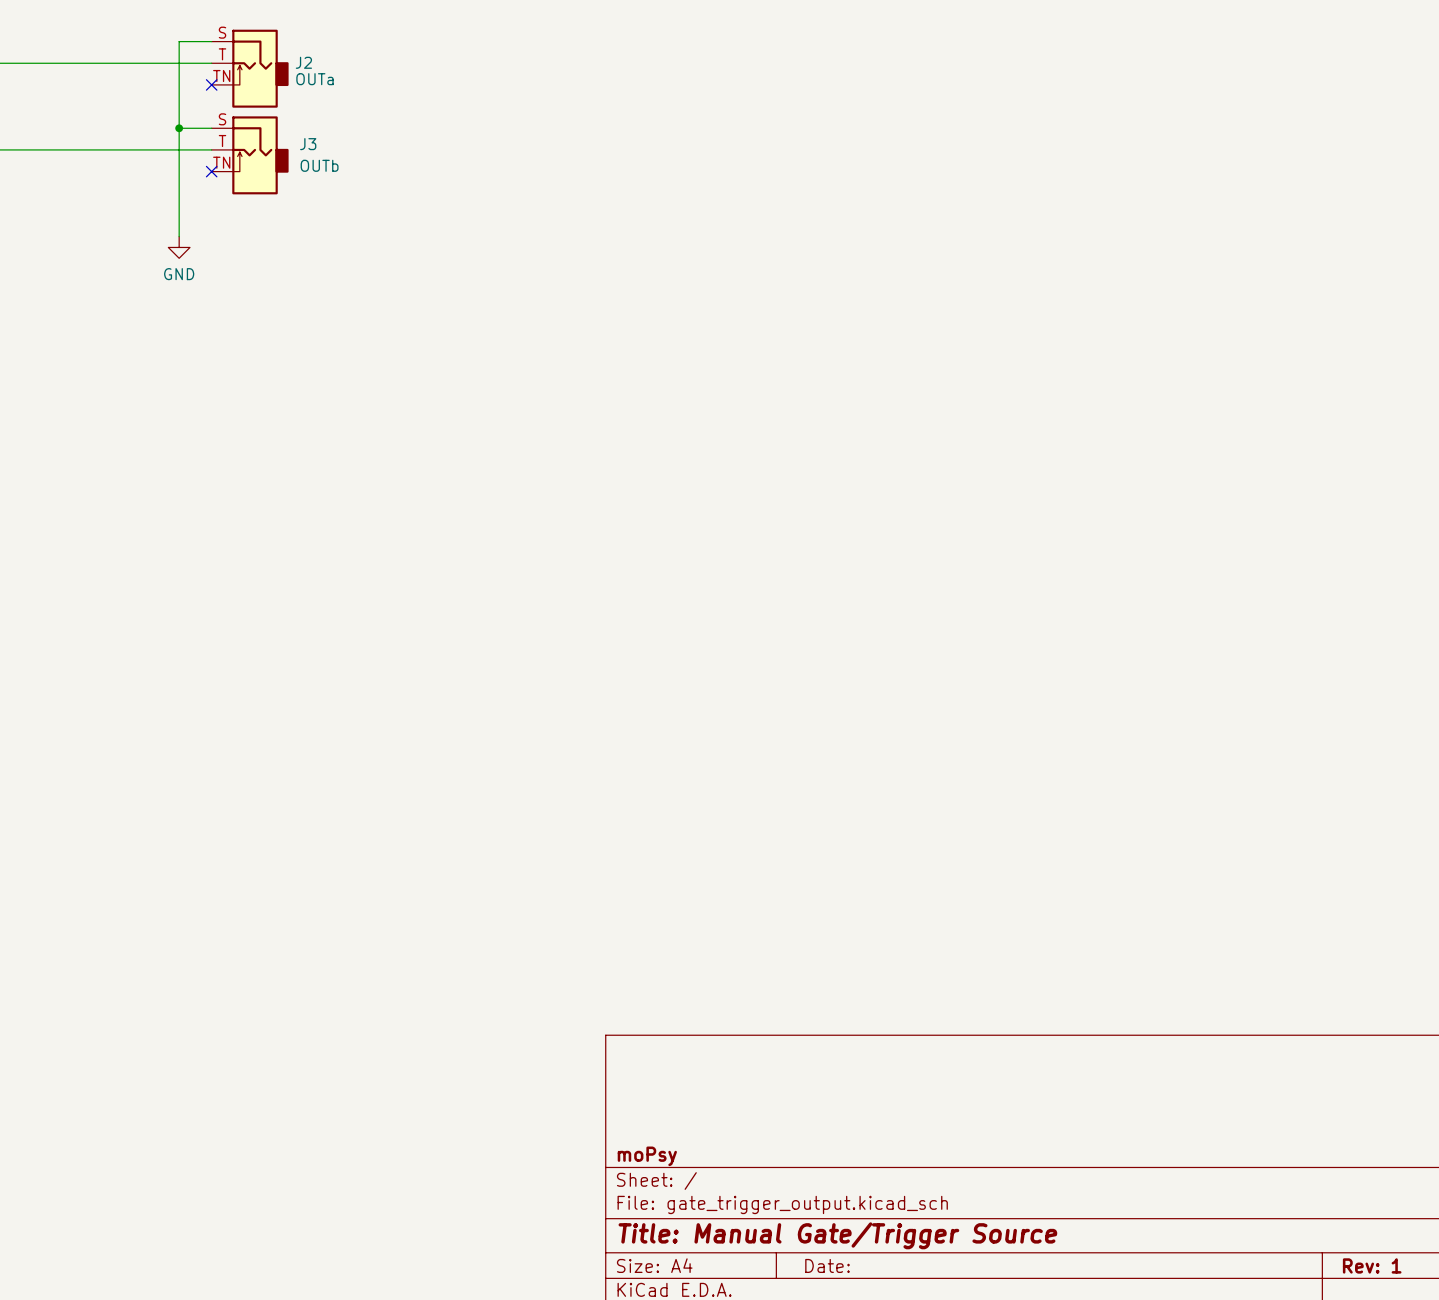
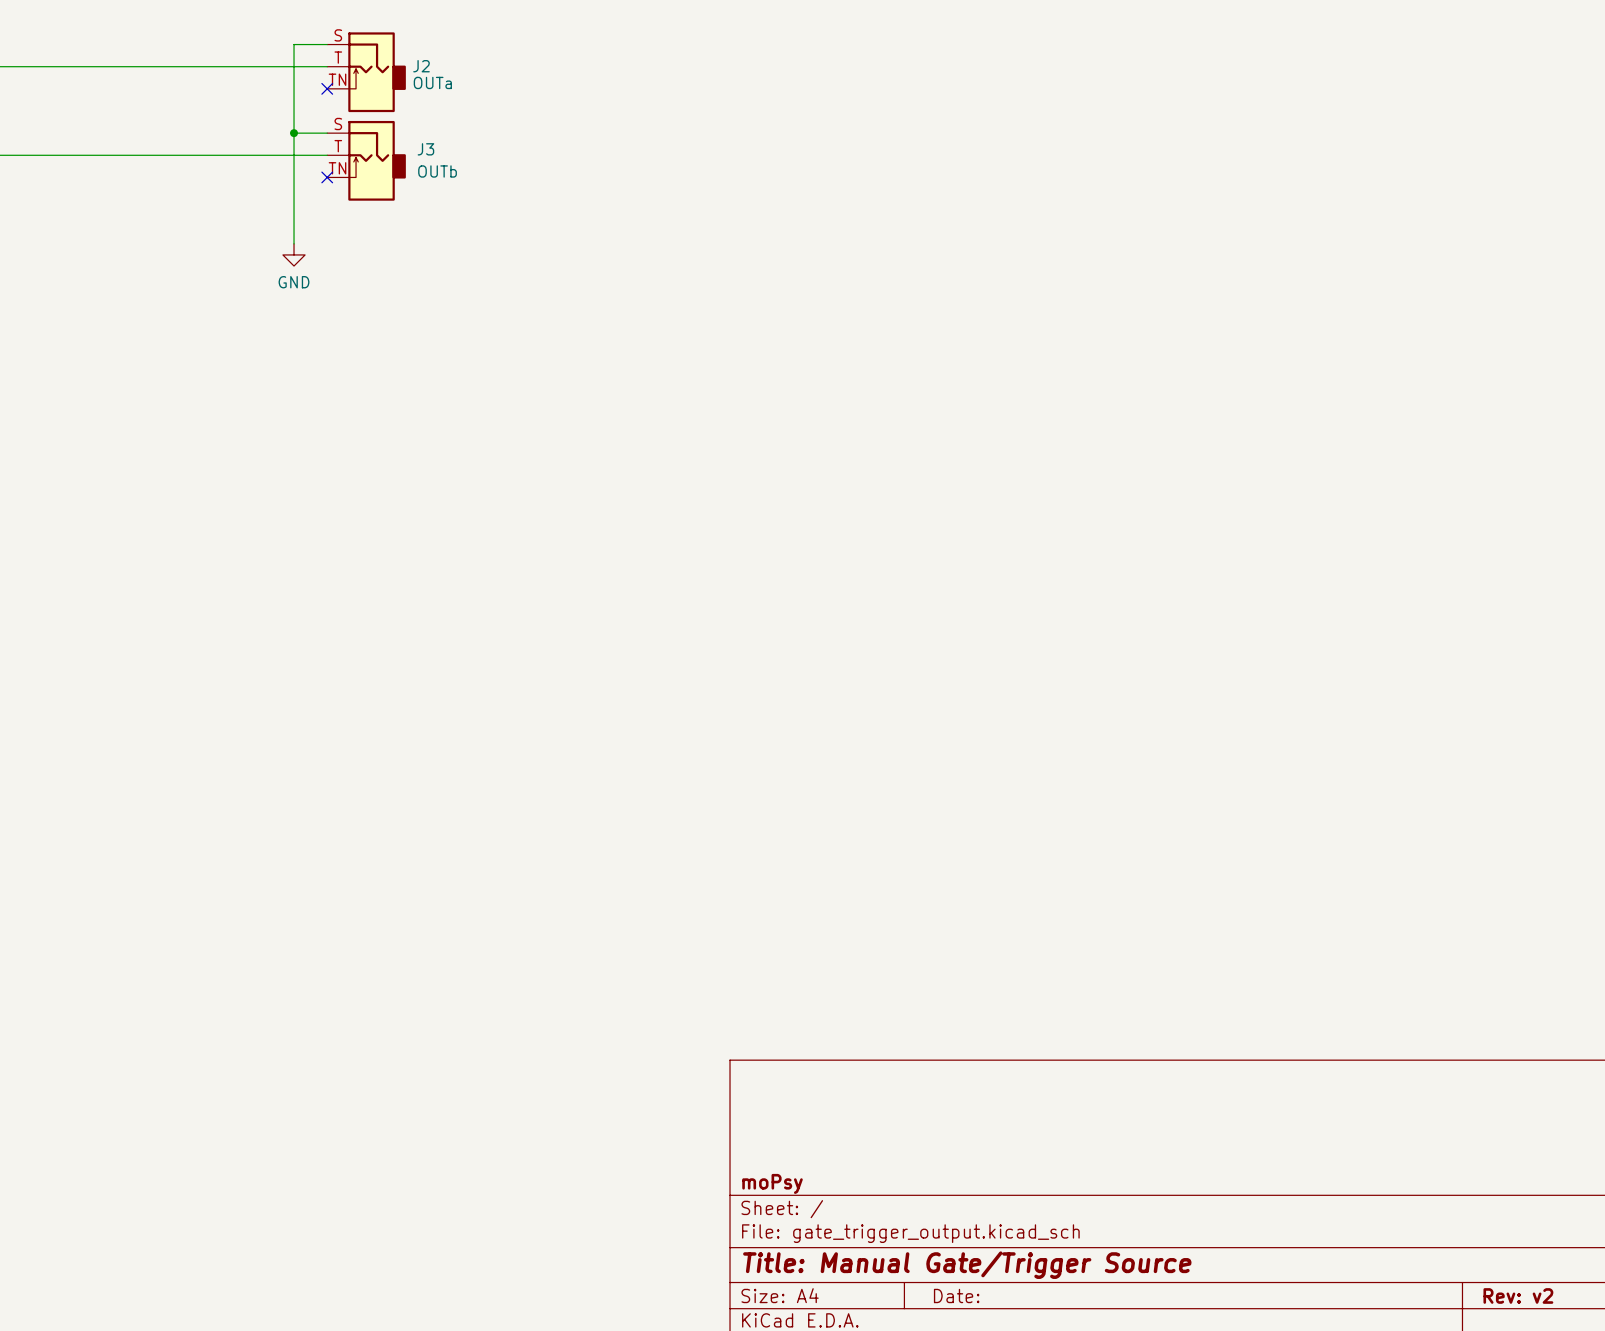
title block: Rev: 1 (1372, 1265) -> Rev: v2 (1518, 1295)

